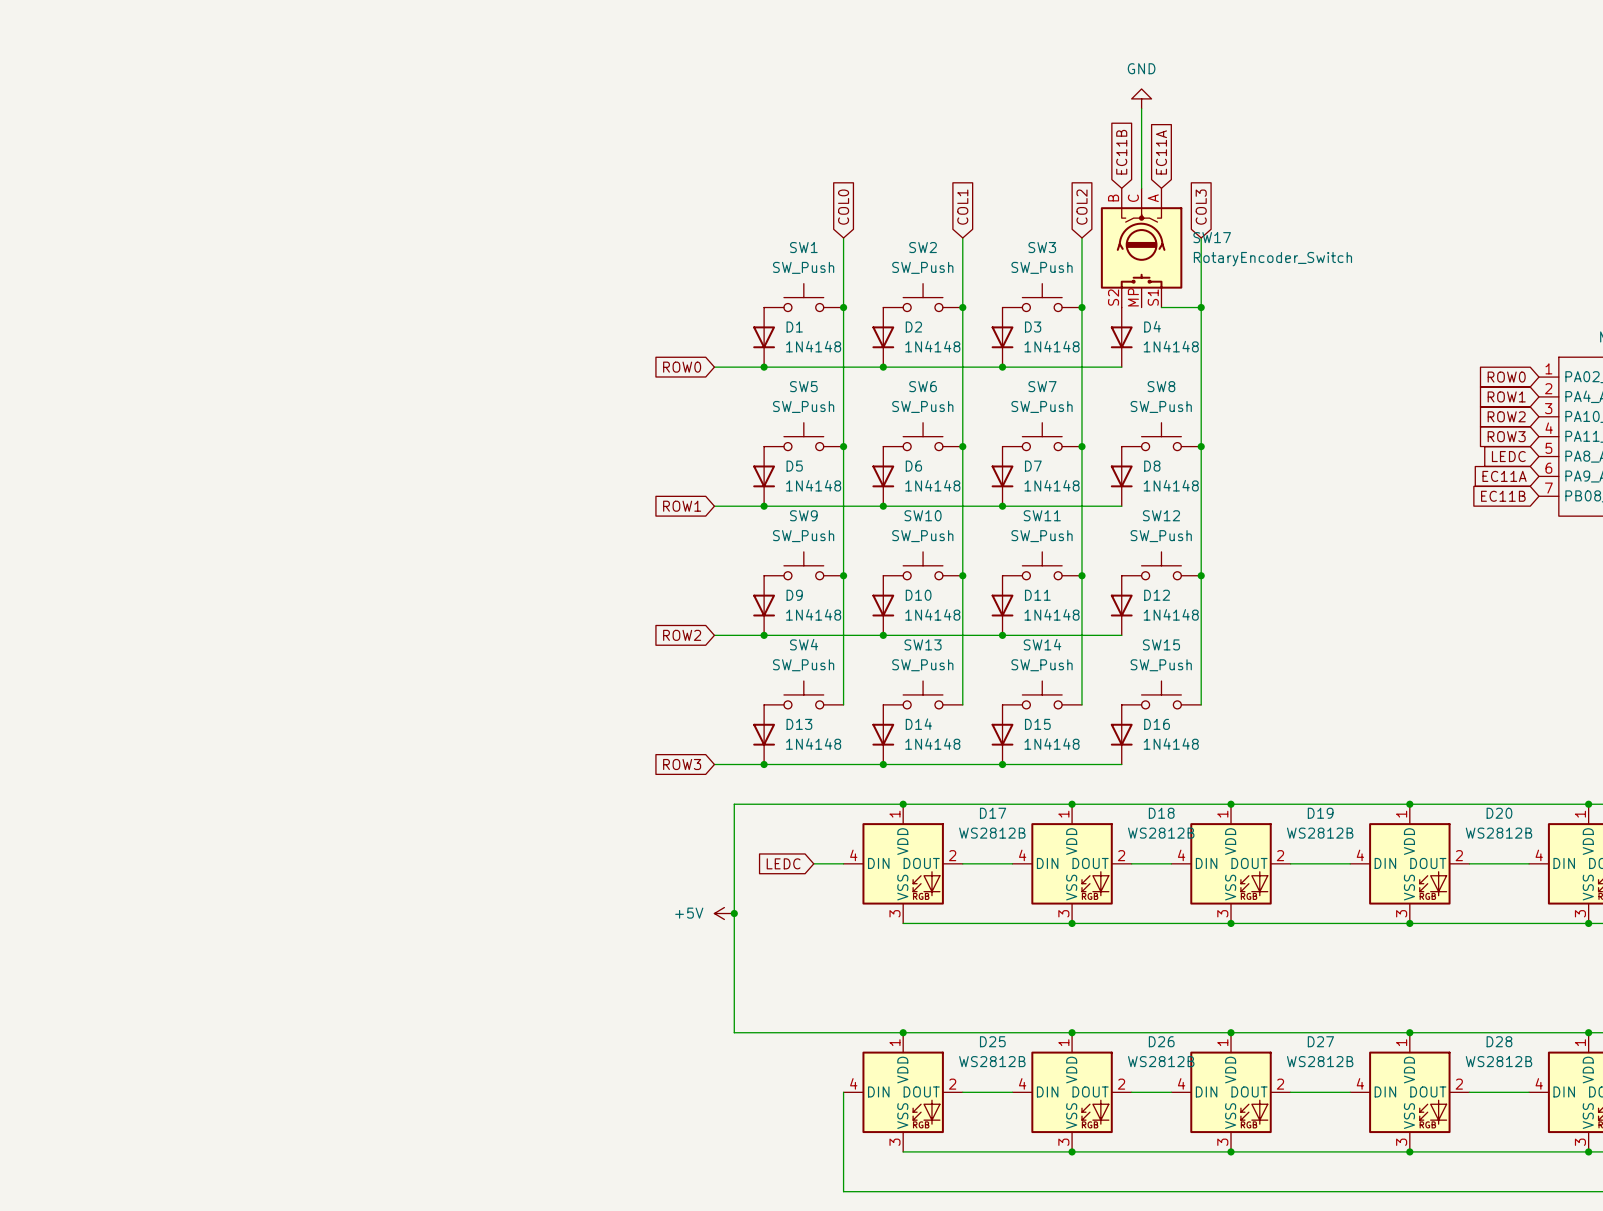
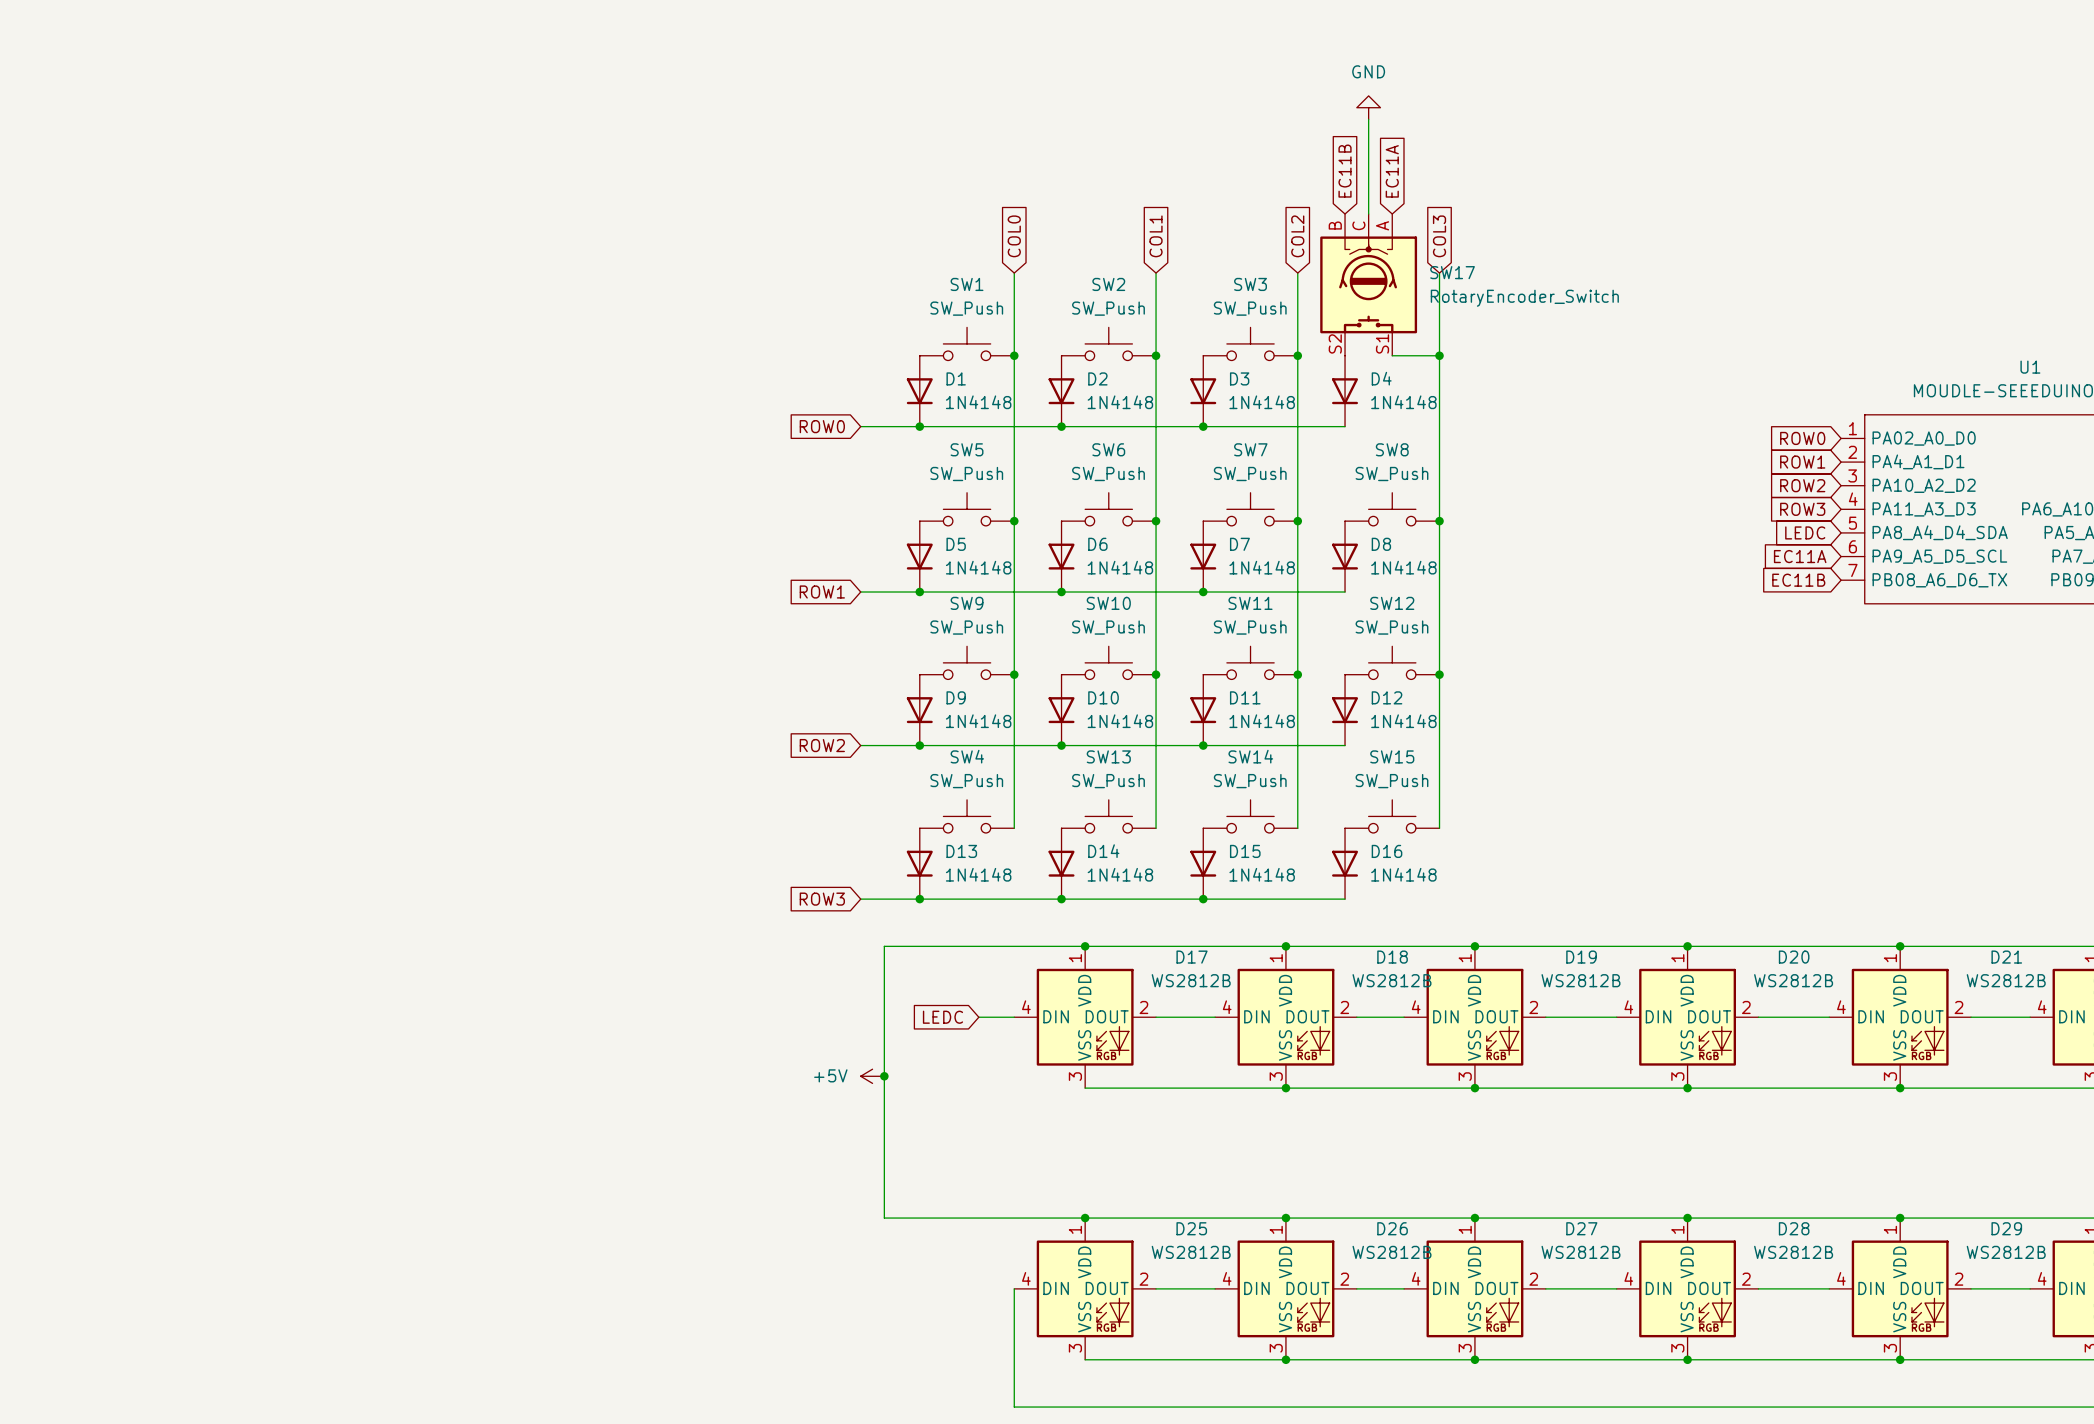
SW17 symbol: [1100, 188, 1183, 308] -> [1320, 214, 1418, 356]

